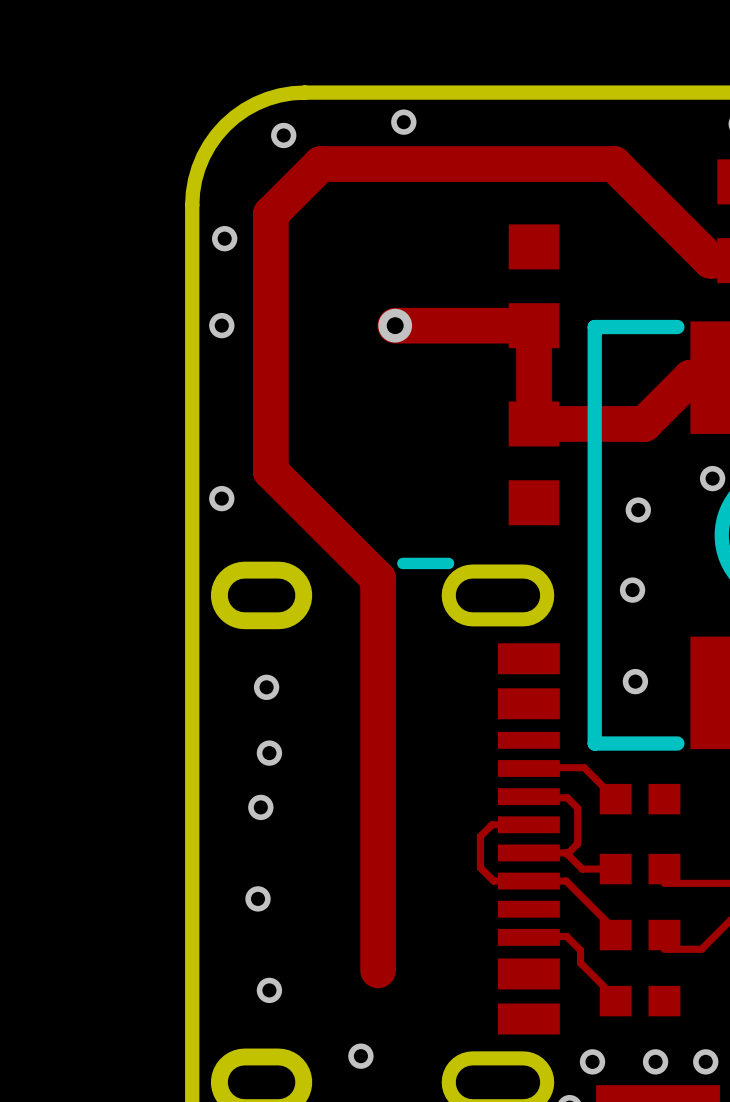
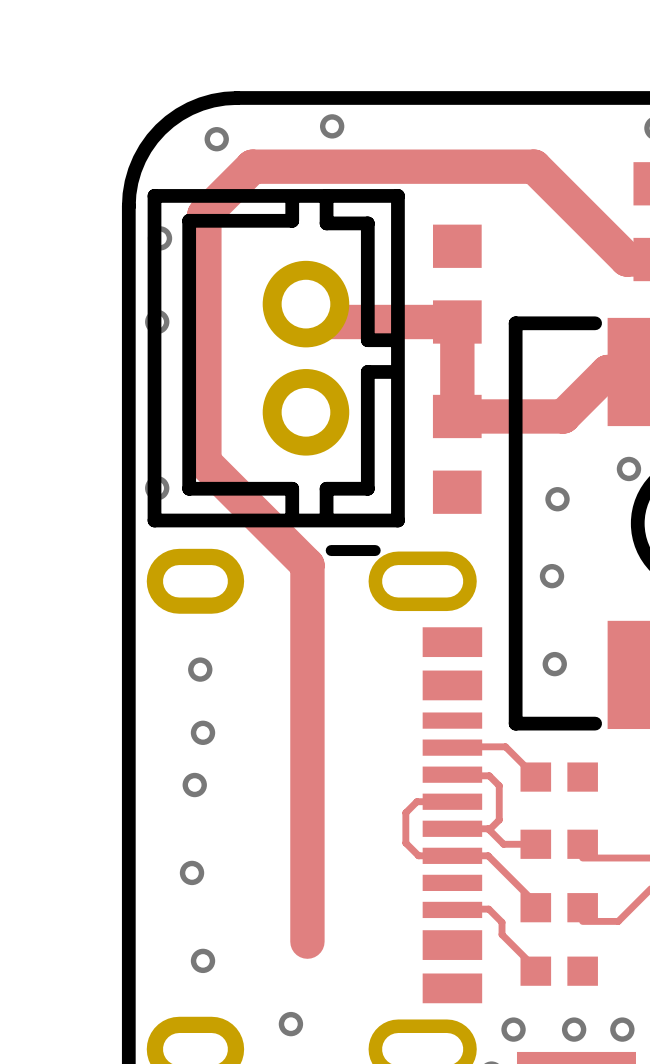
via: (395, 325) -> none
part: none -> (276, 358)

